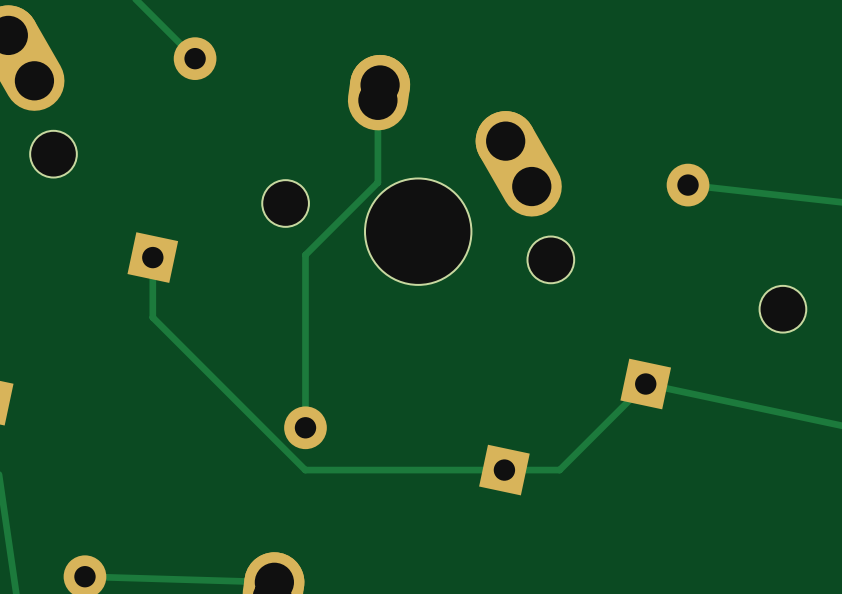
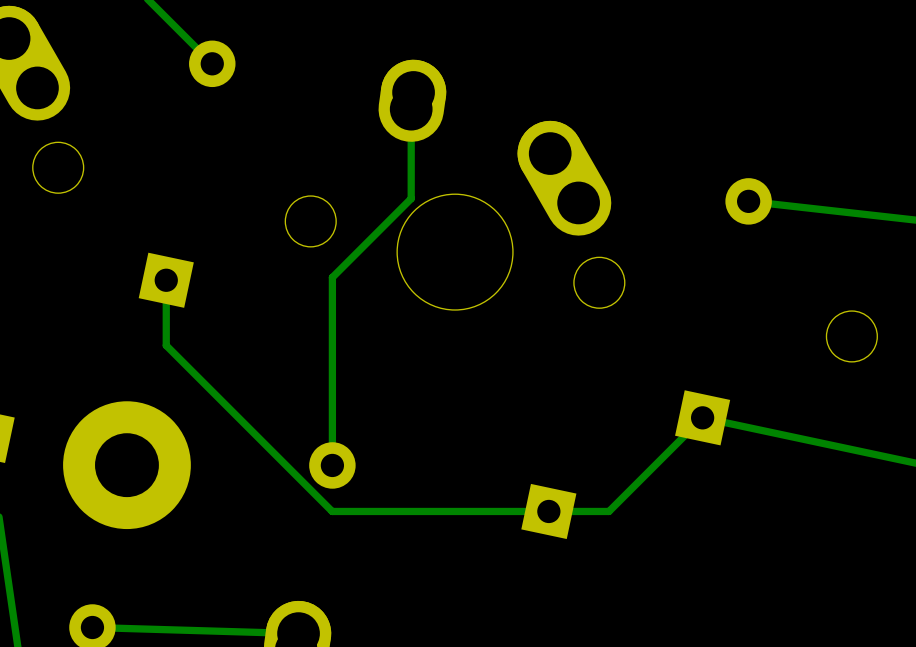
part: none -> (126, 465)

